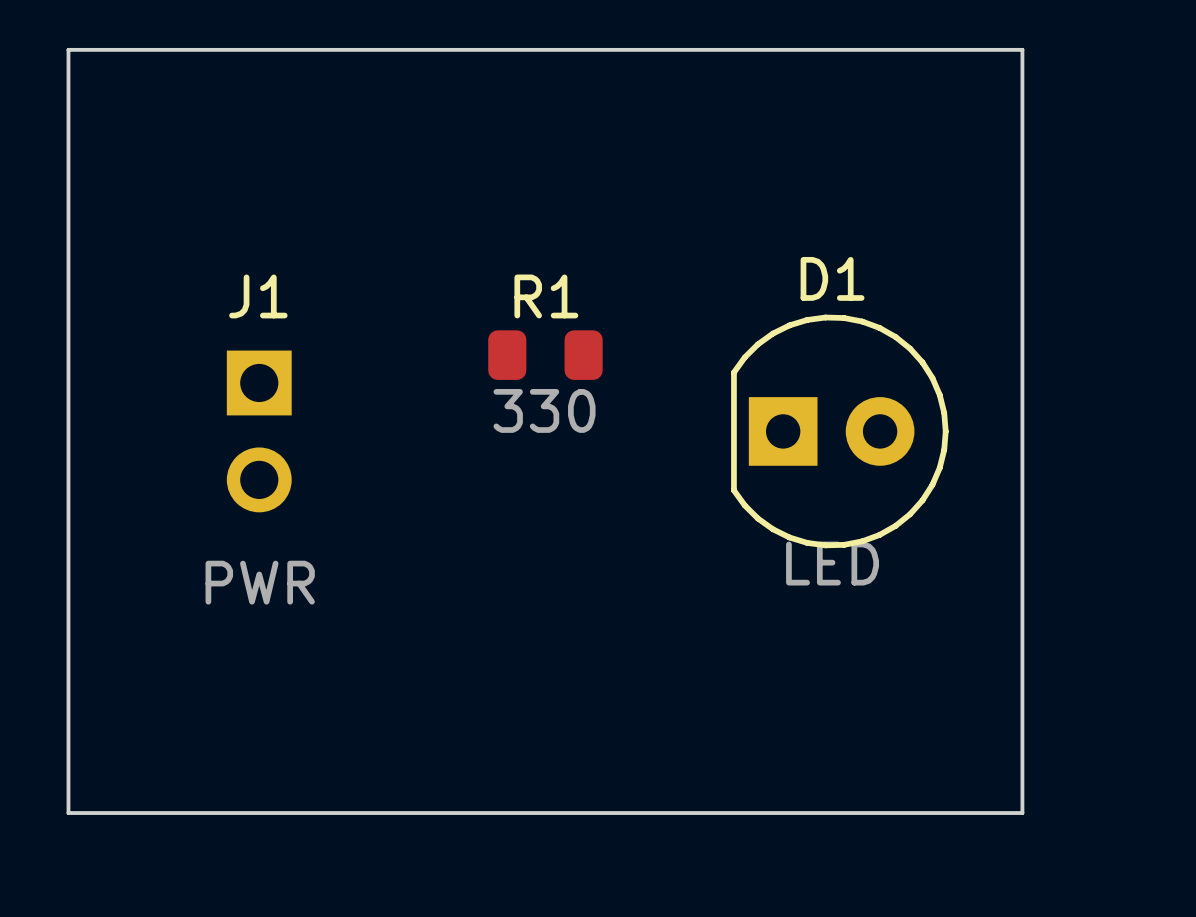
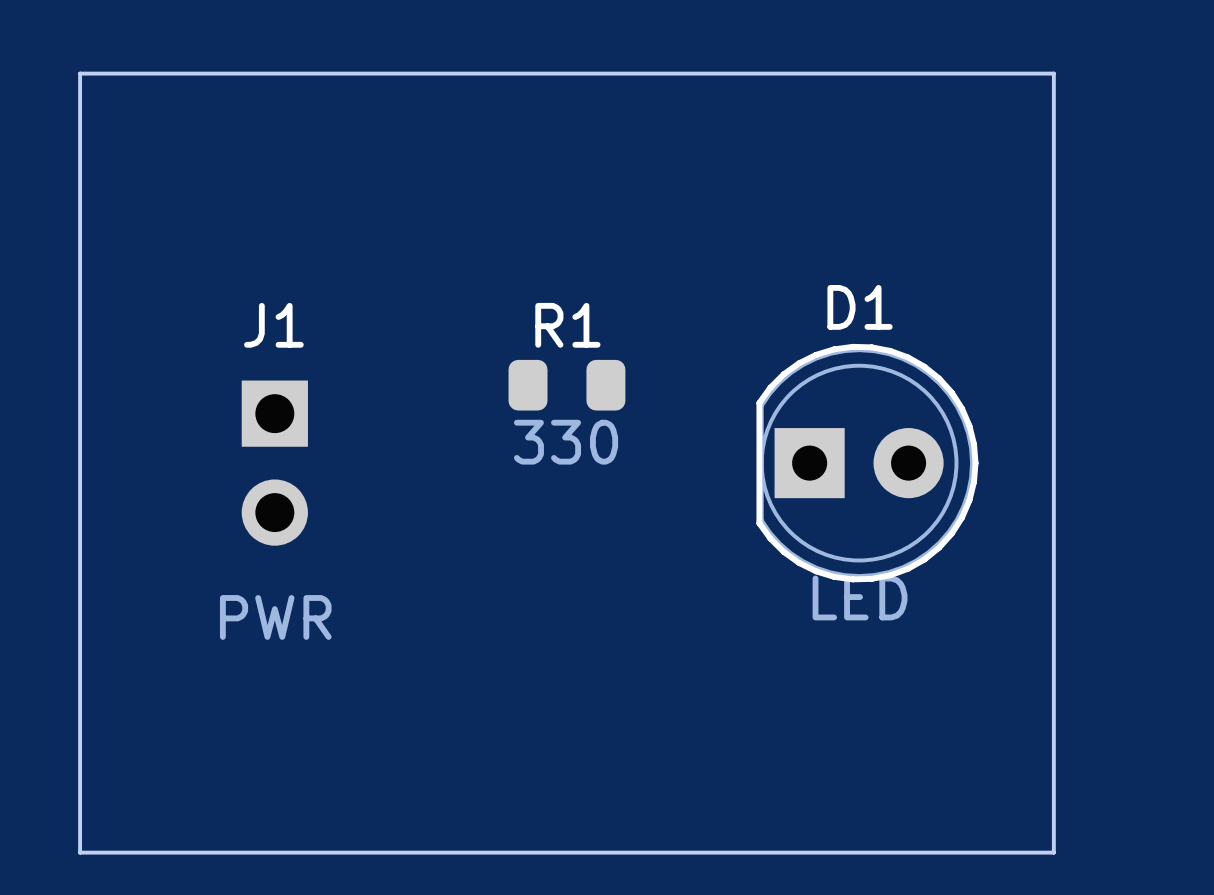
D1 footprint: [731, 314, 949, 549] -> [756, 343, 979, 583]

